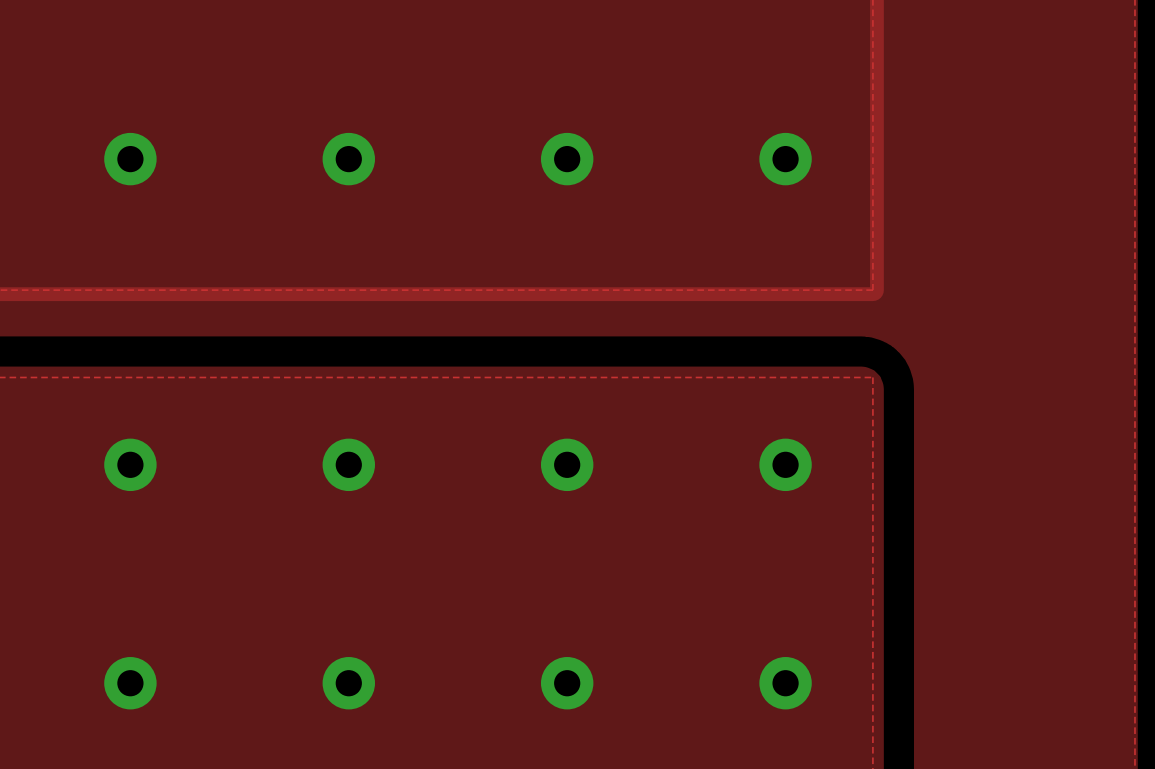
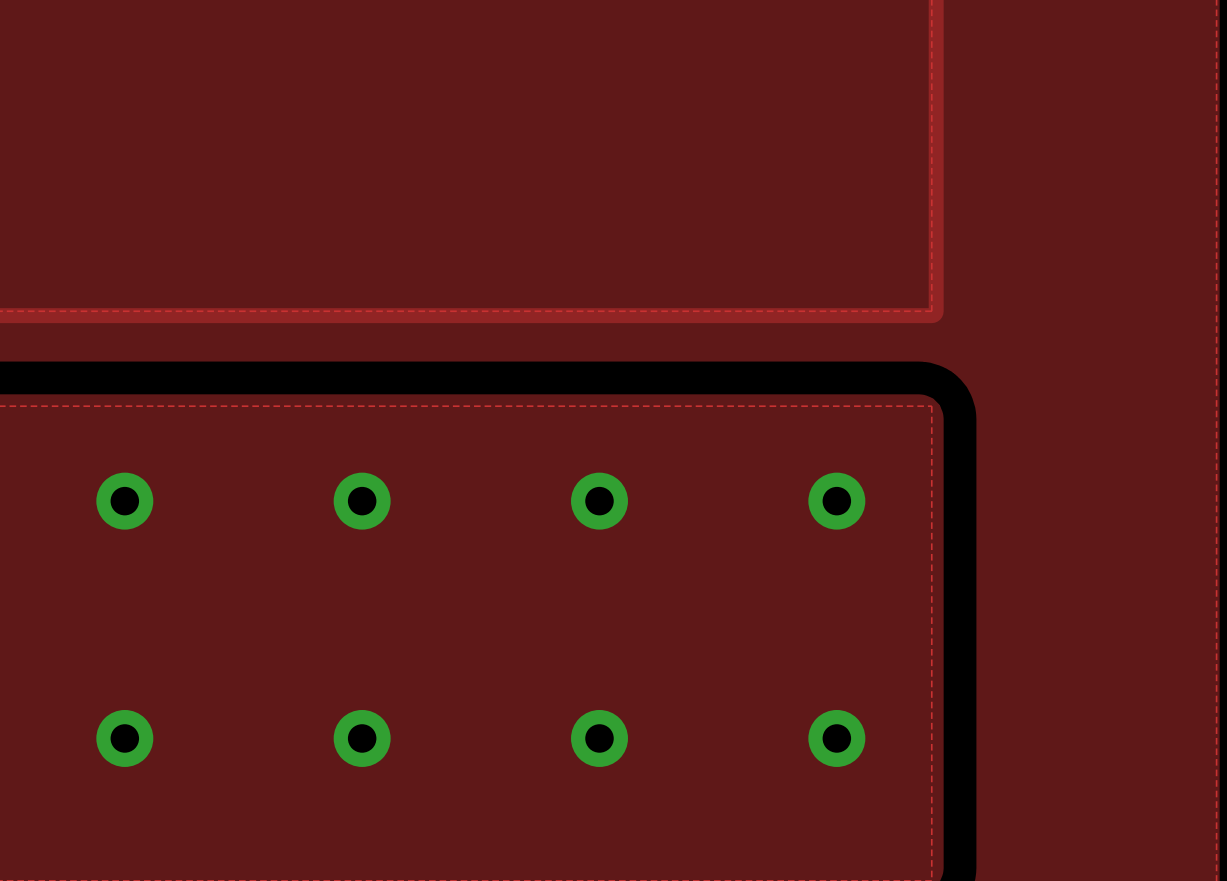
via: (130, 159) -> none
via: (348, 159) -> none
via: (567, 159) -> none
via: (785, 159) -> none

